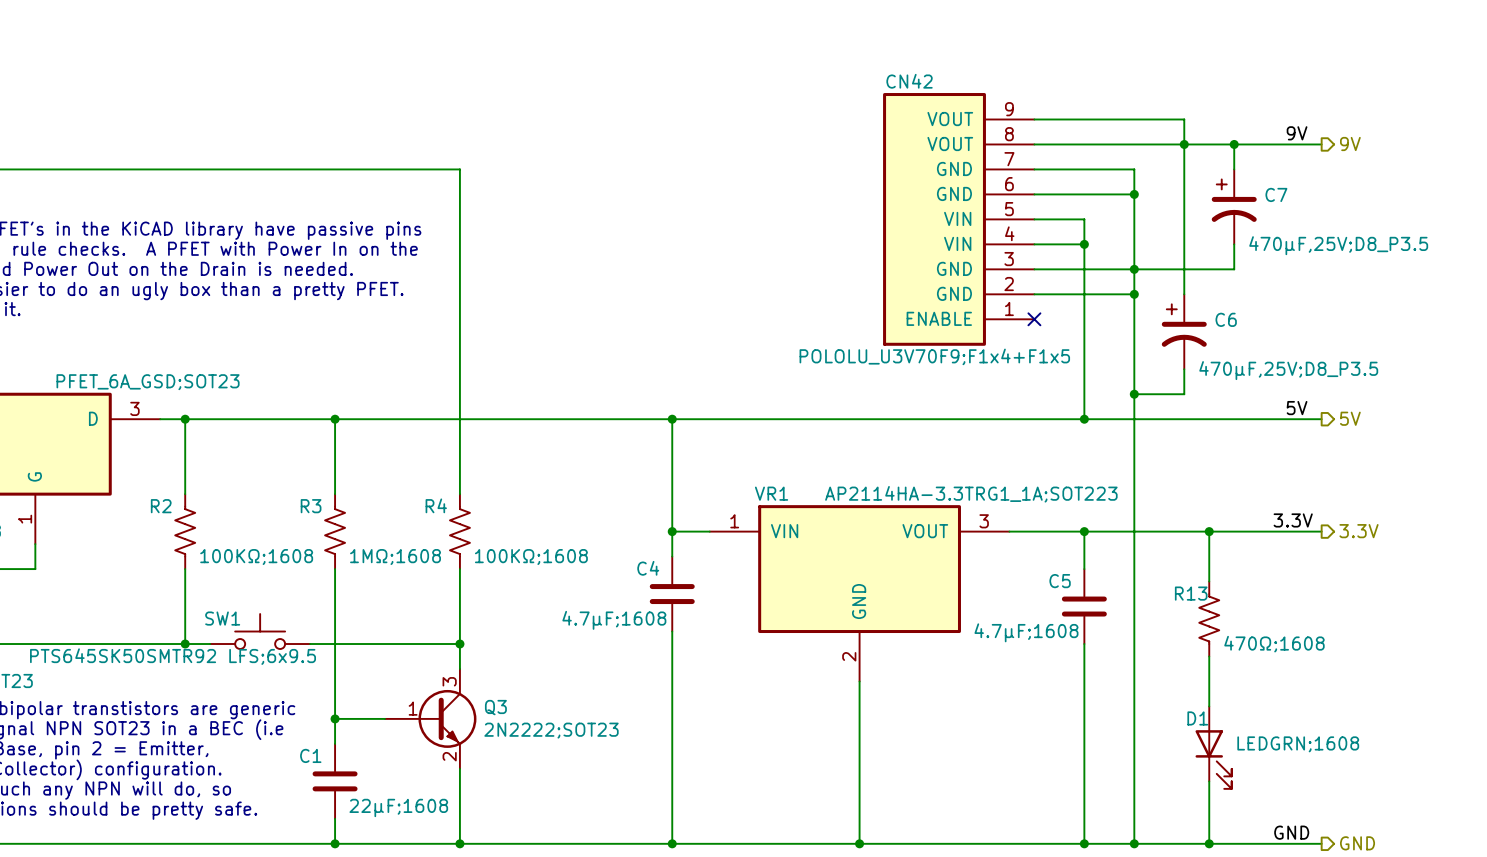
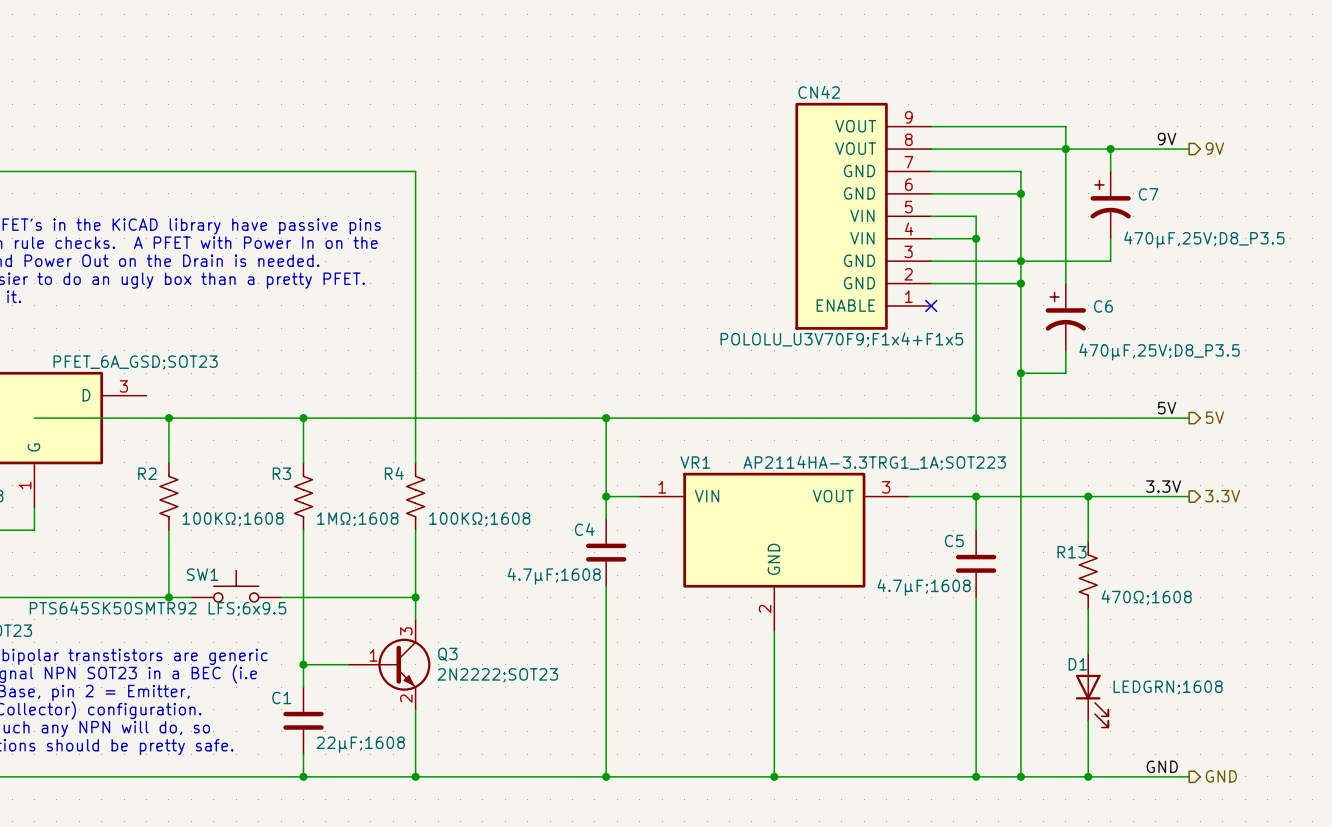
label position: 5V (1297, 408) -> 5V (1167, 408)
hierarchical label position: 5V (1350, 418) -> 5V (1214, 417)
wire: (160, 419) (1321, 419) -> none
wire: (185, 419) (185, 444) -> none
junction position: (185, 419) -> (168, 418)
wire: (335, 419) (335, 444) -> none
junction position: (335, 419) -> (303, 418)
wire: (672, 419) (672, 444) -> none
junction position: (672, 419) -> (606, 418)
wire: none -> (976, 395) (976, 418)
junction position: (1084, 419) -> (976, 418)
wire: none -> (34, 418) (1189, 418)

